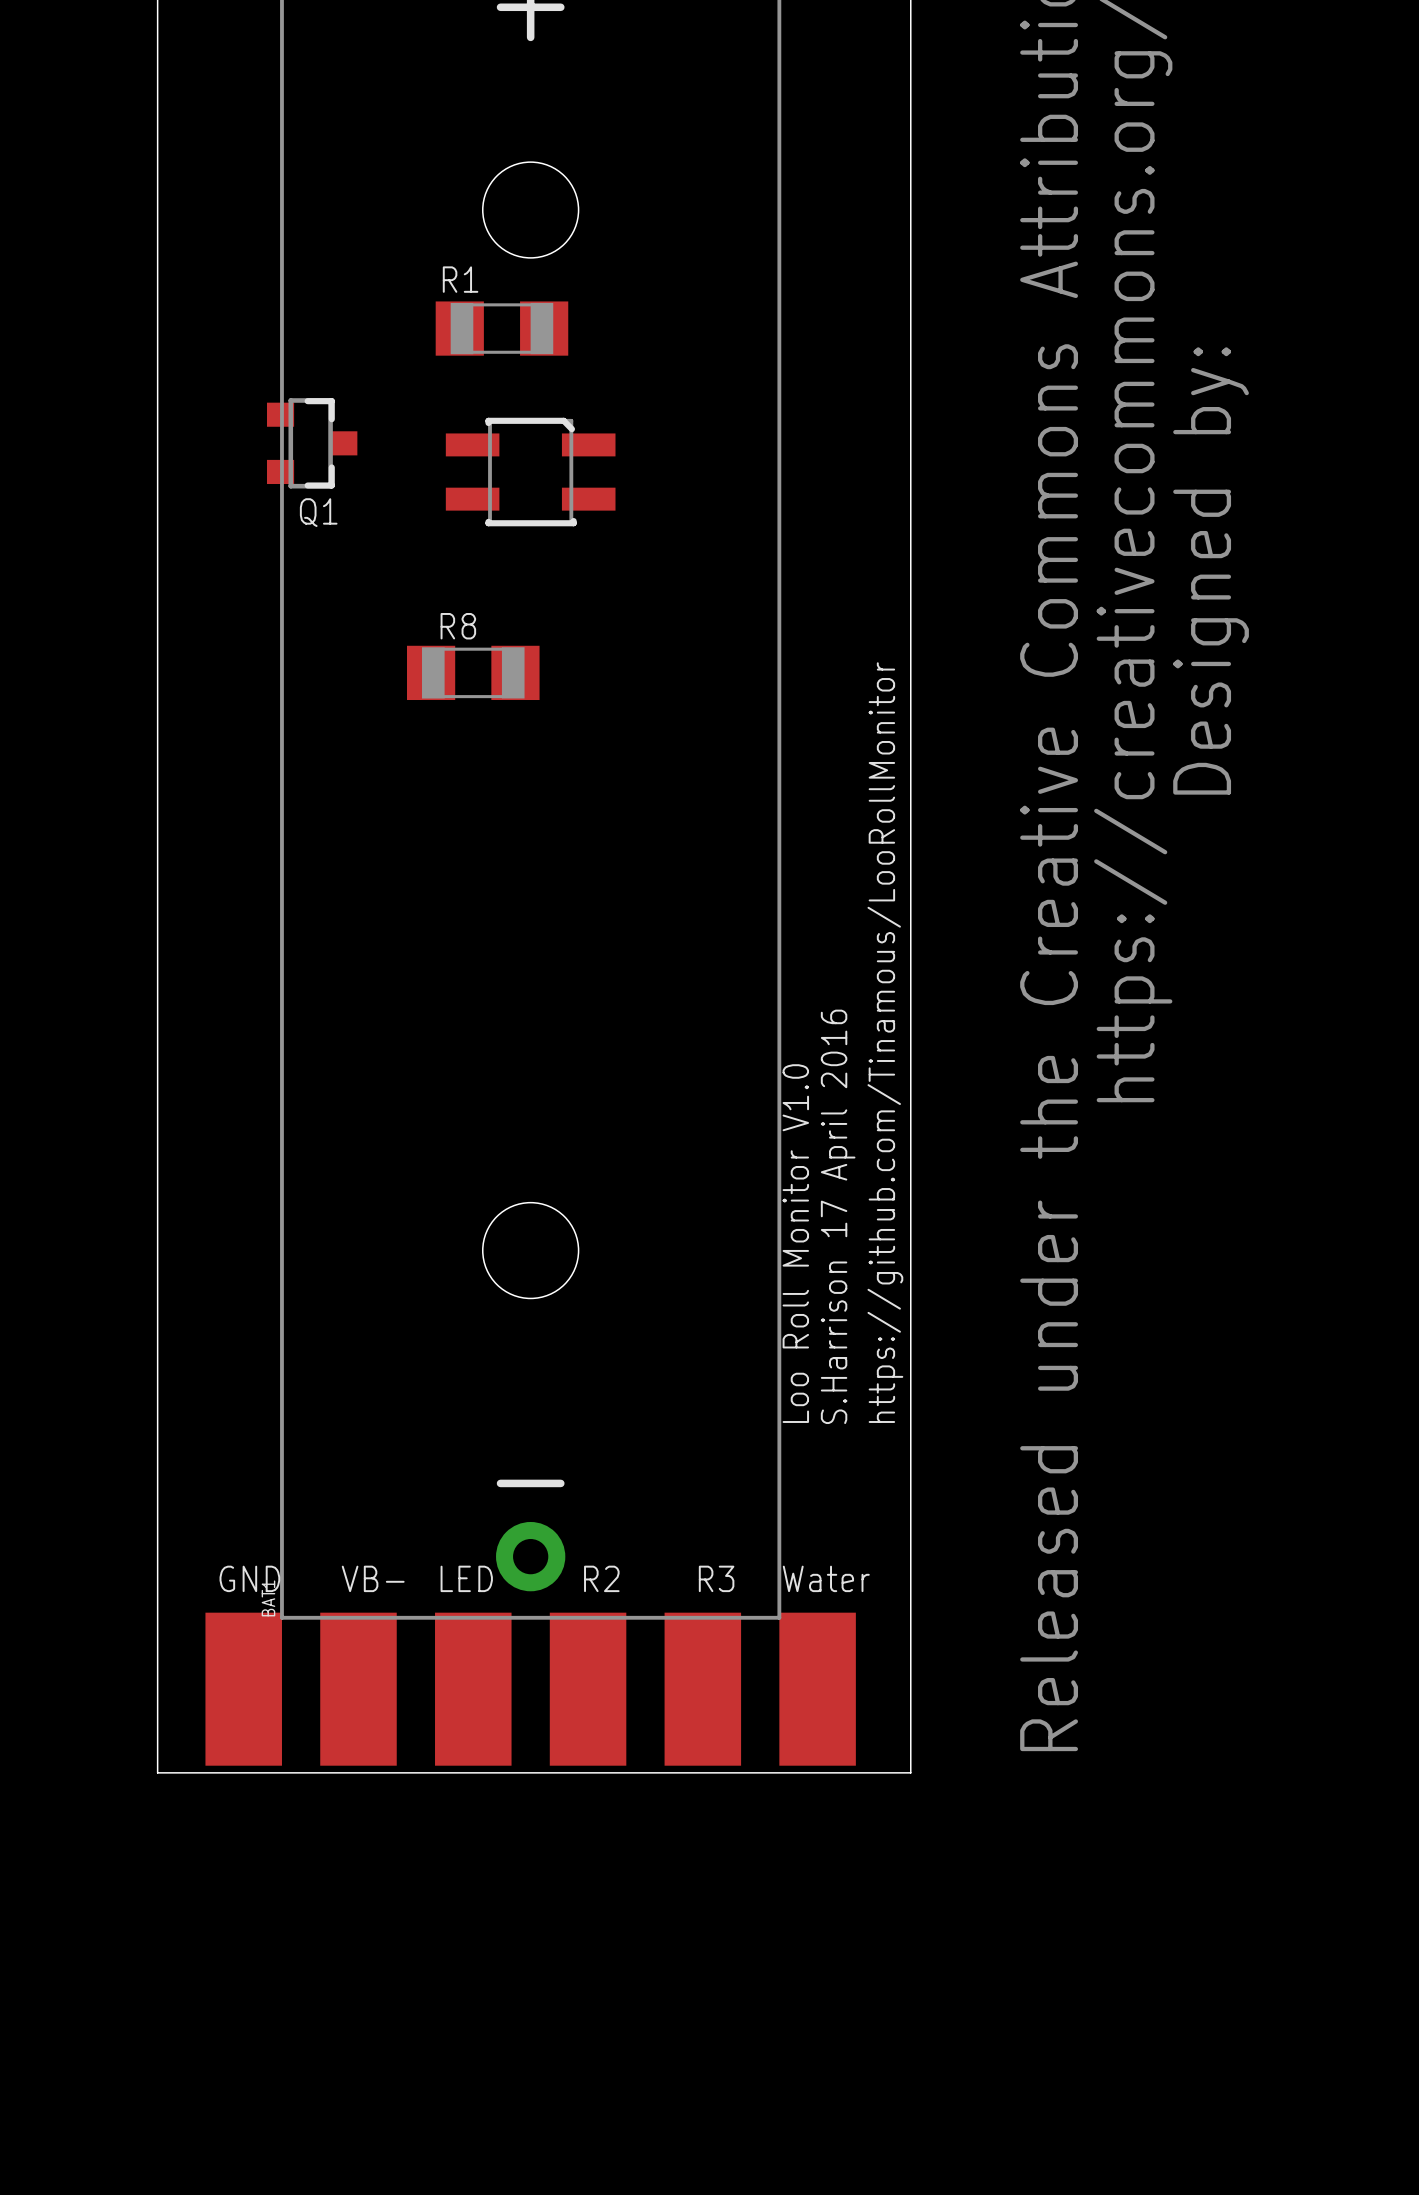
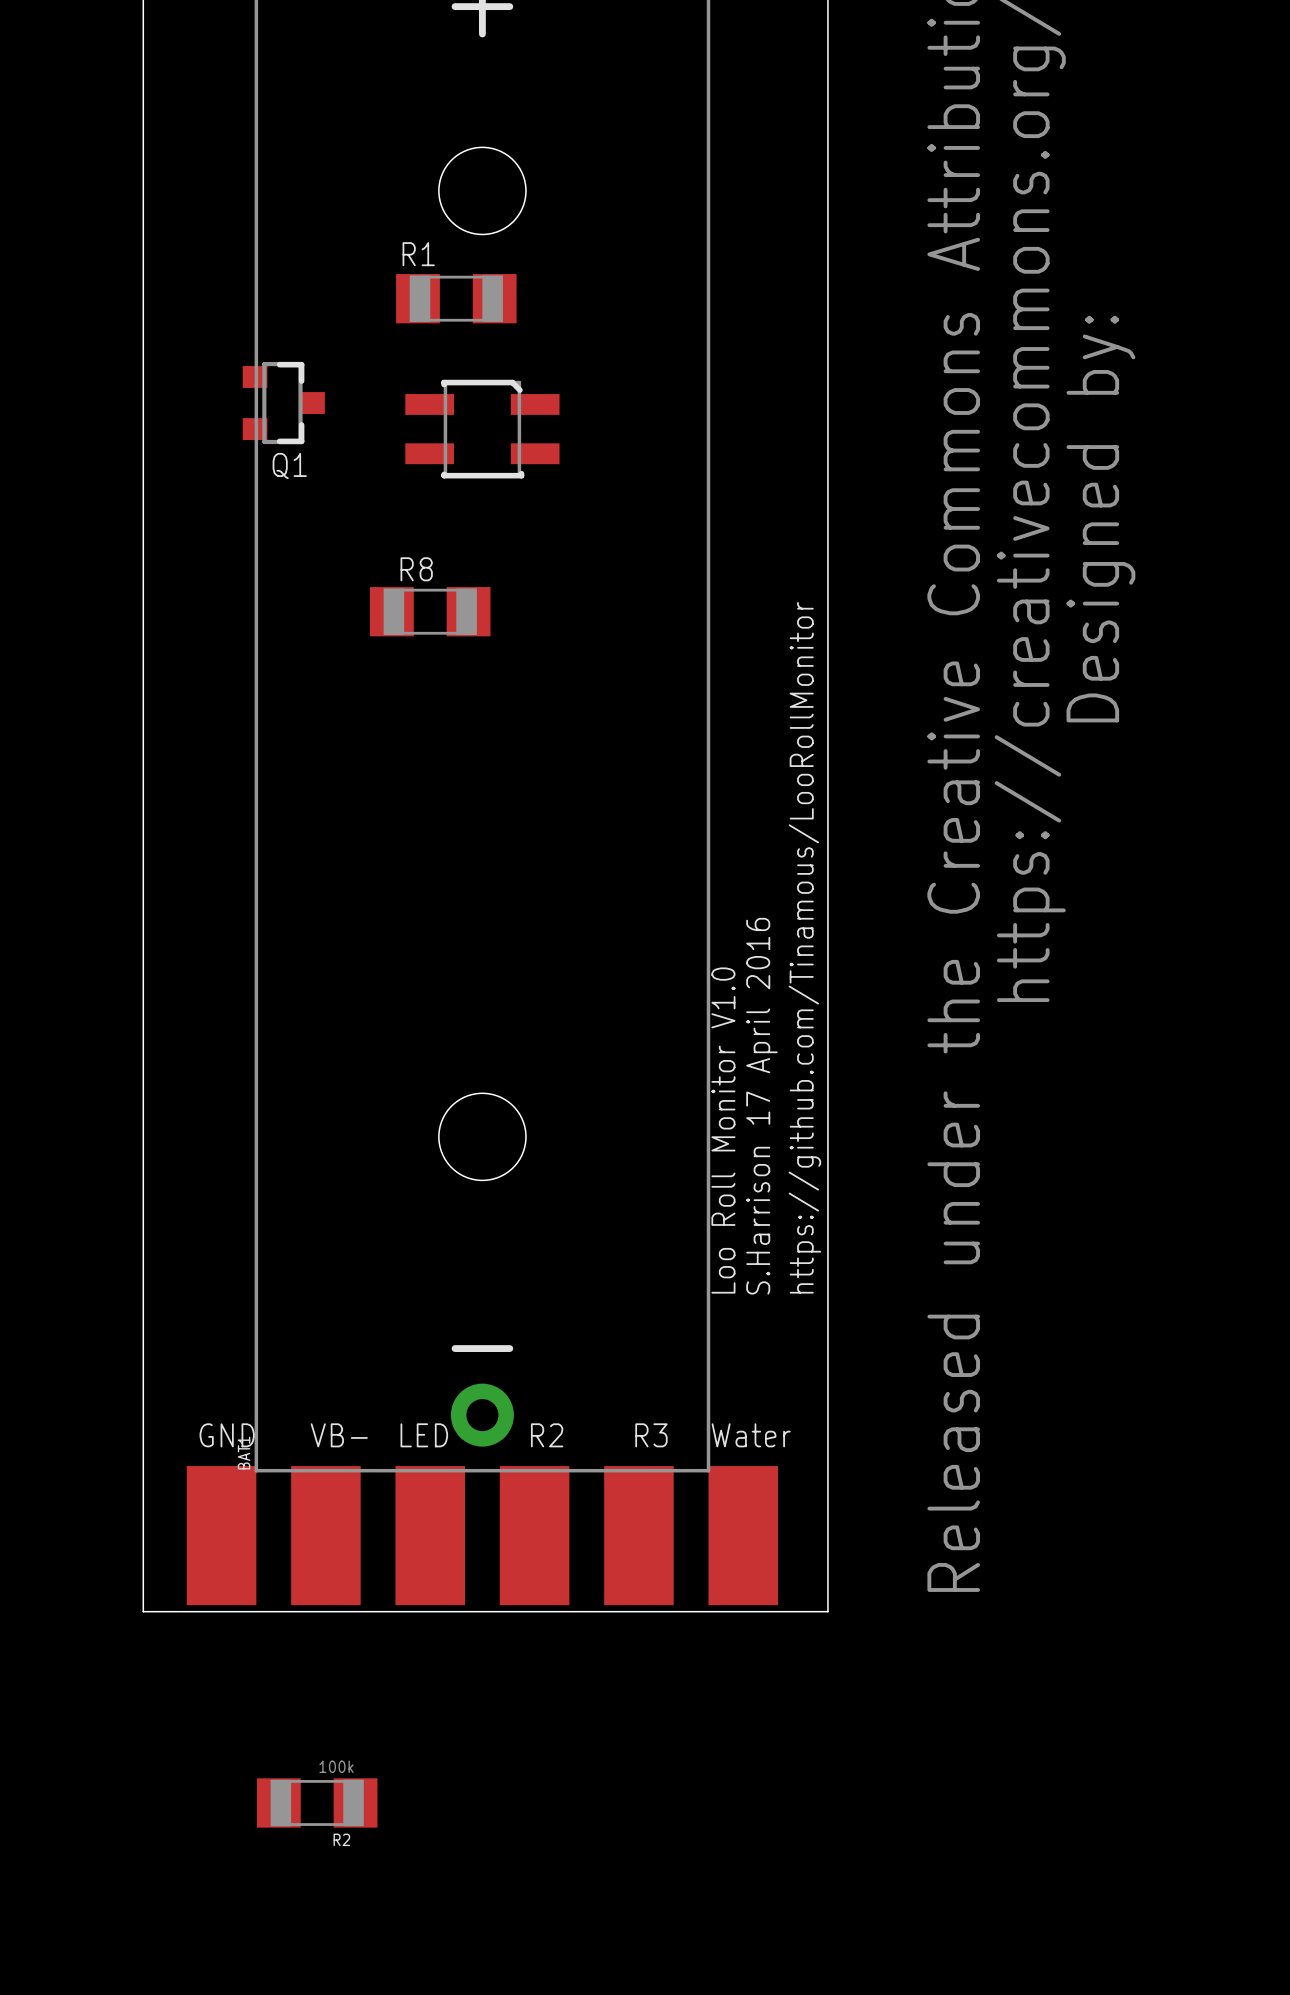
R2: none -> 100k (317, 1802)

